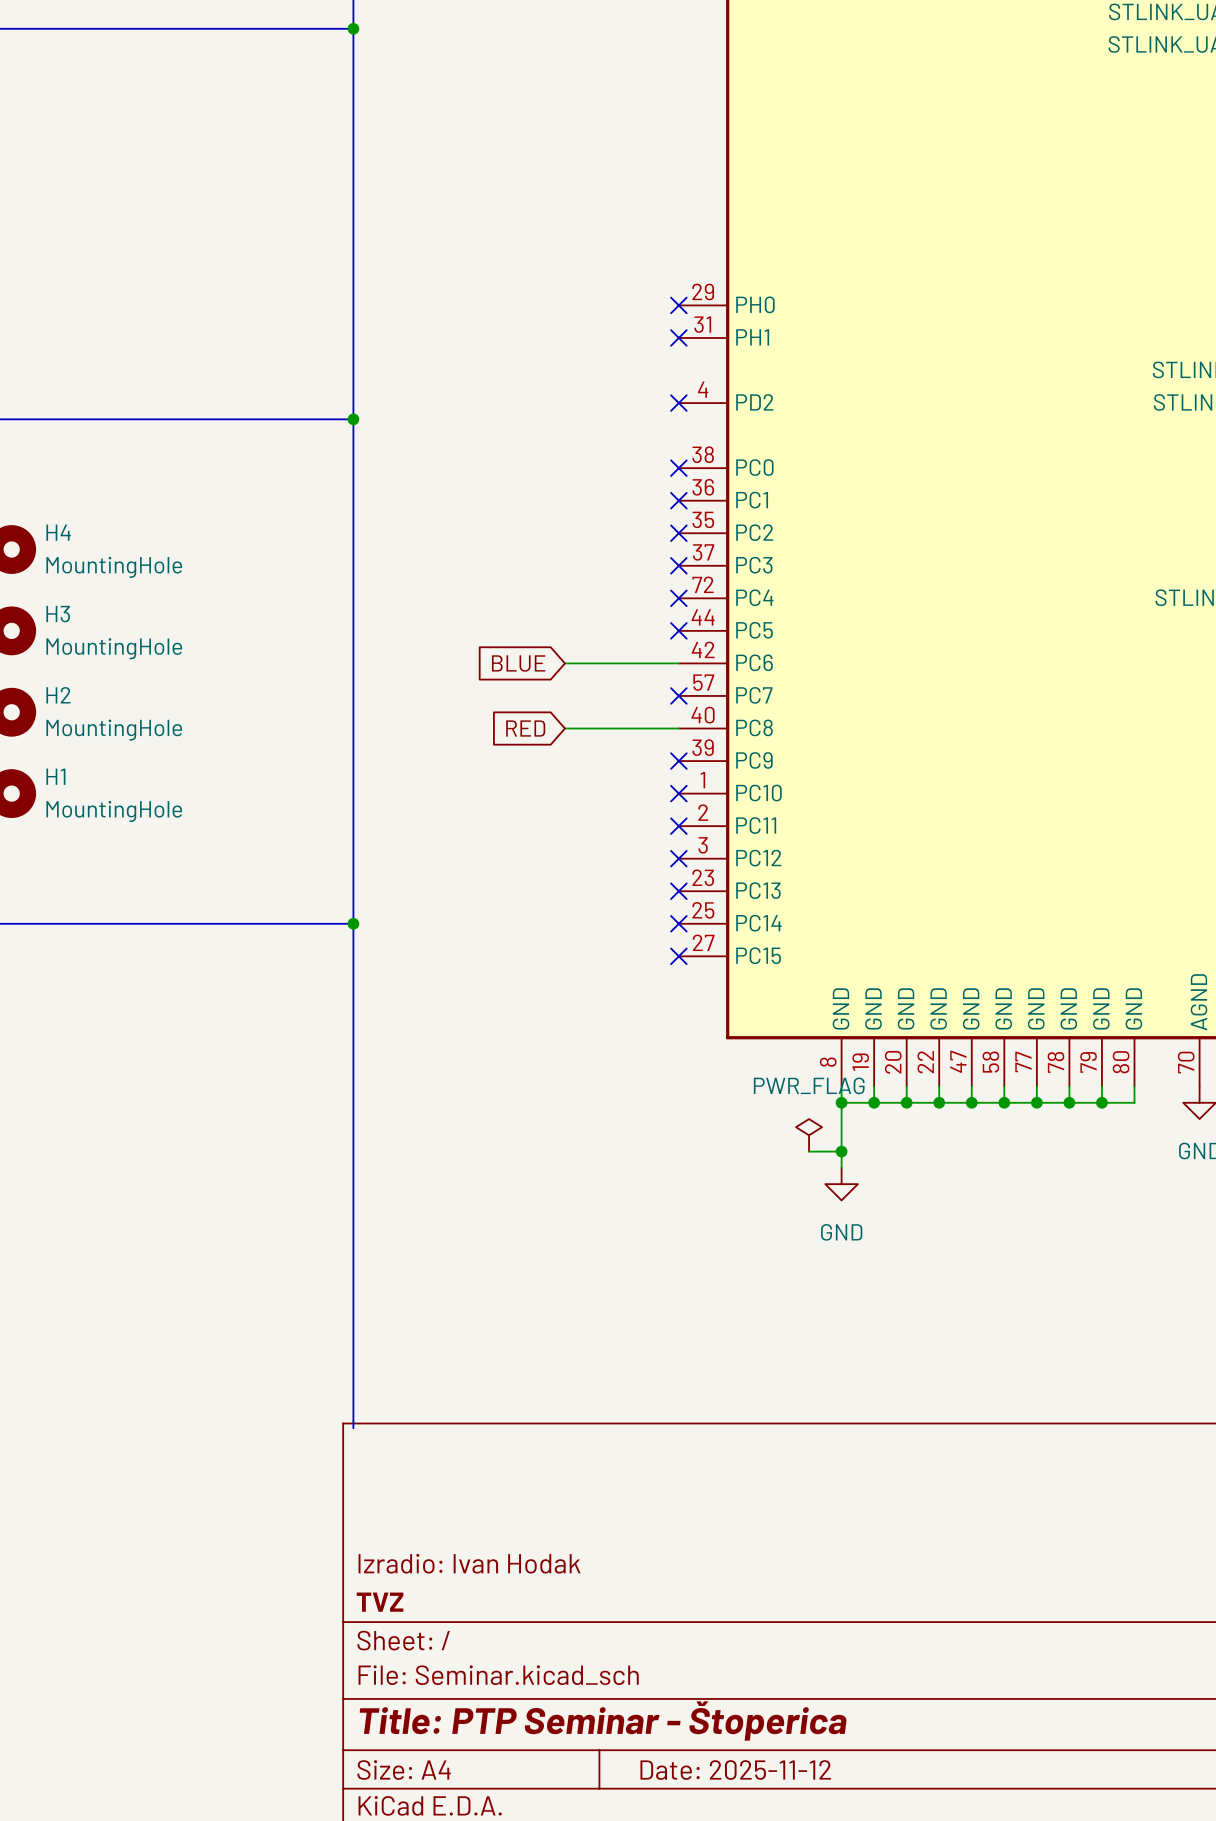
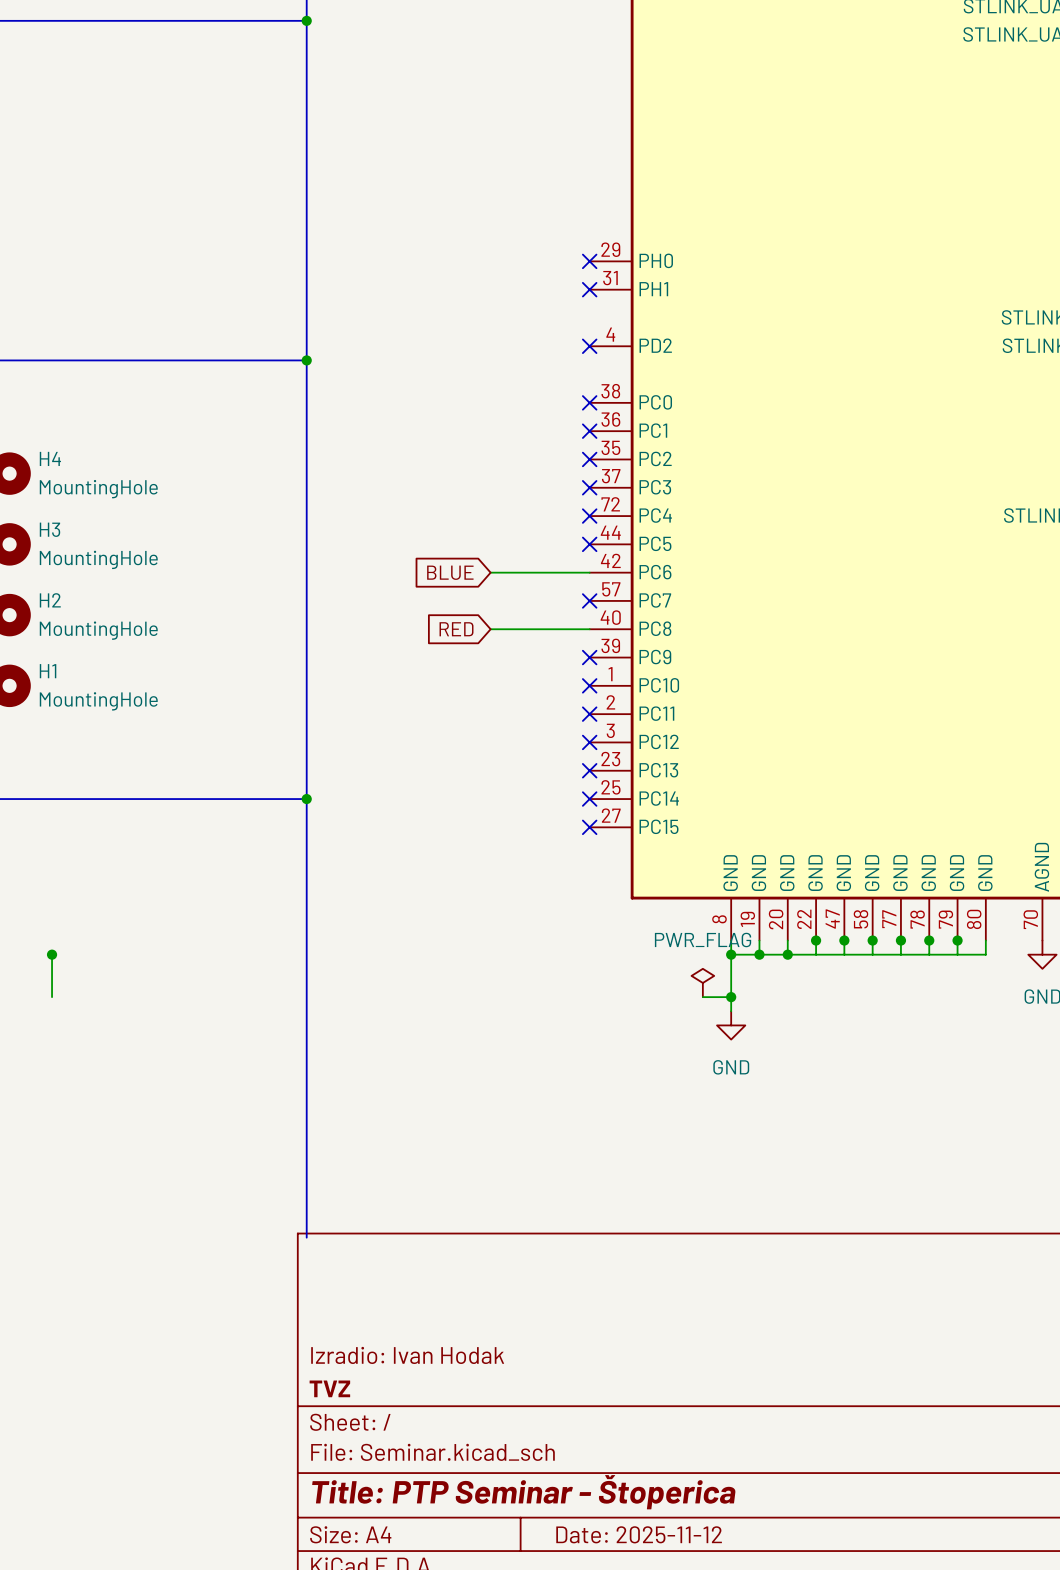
wire: none -> (52, 954) (52, 997)
junction: none -> (52, 954)
junction position: (939, 1102) -> (816, 940)
junction position: (971, 1102) -> (844, 940)
junction position: (1004, 1102) -> (872, 940)
junction position: (1036, 1102) -> (900, 940)
junction position: (1069, 1102) -> (929, 940)
junction position: (1101, 1102) -> (957, 940)

